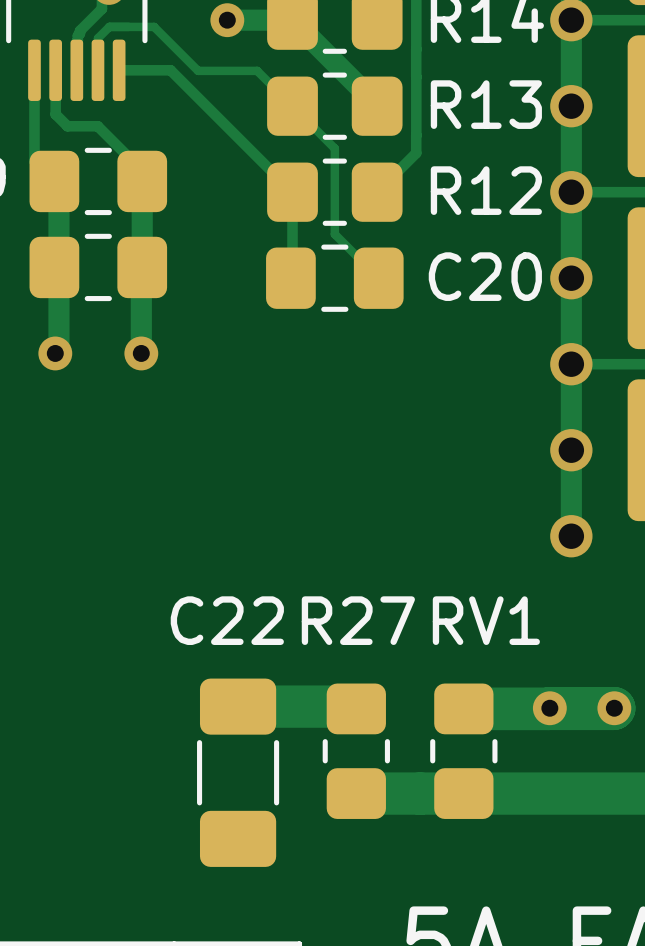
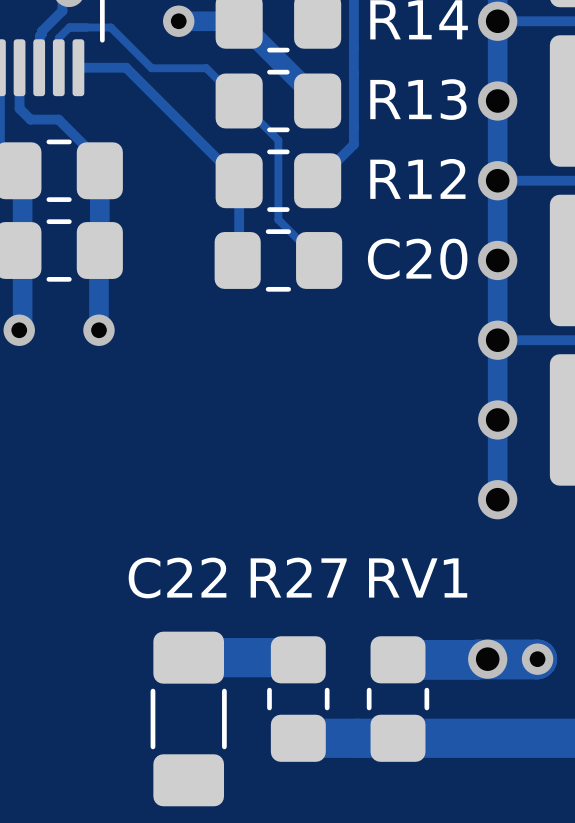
via size: [532, 691, 567, 726] -> [468, 639, 508, 679]

